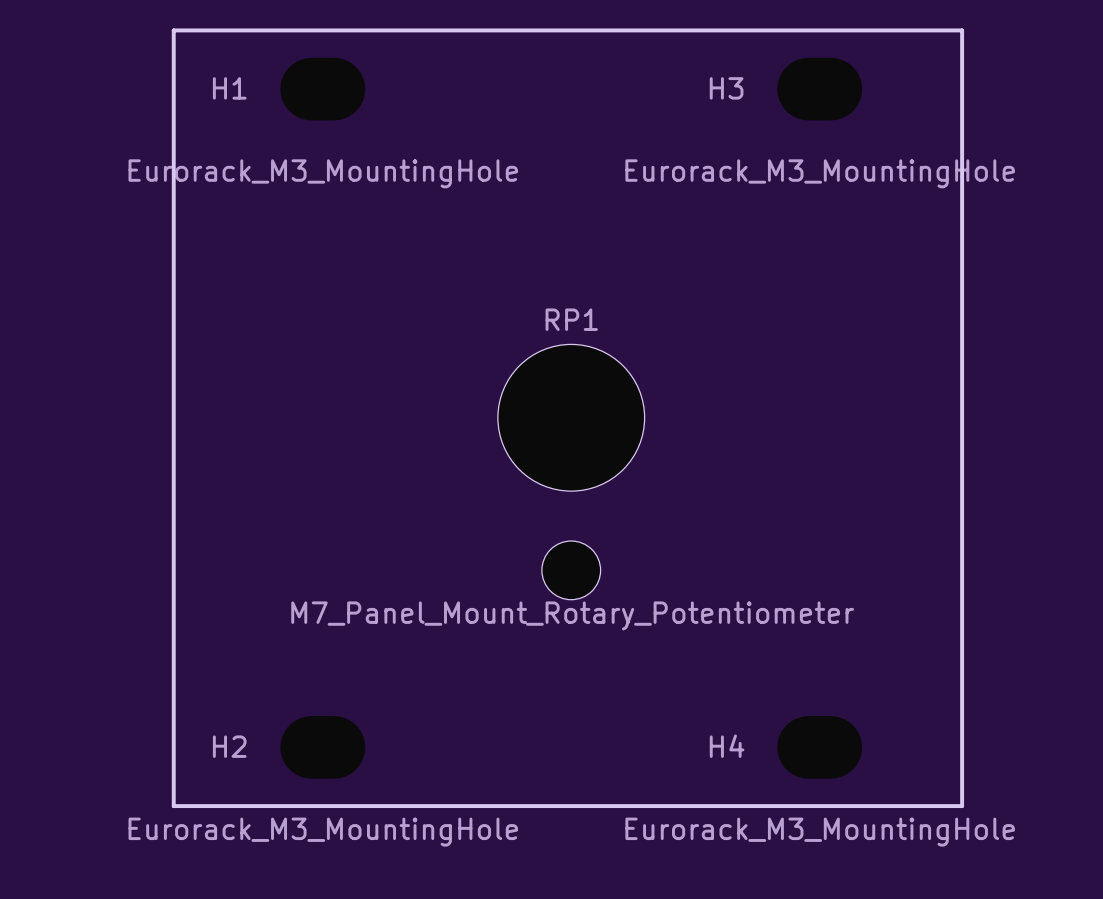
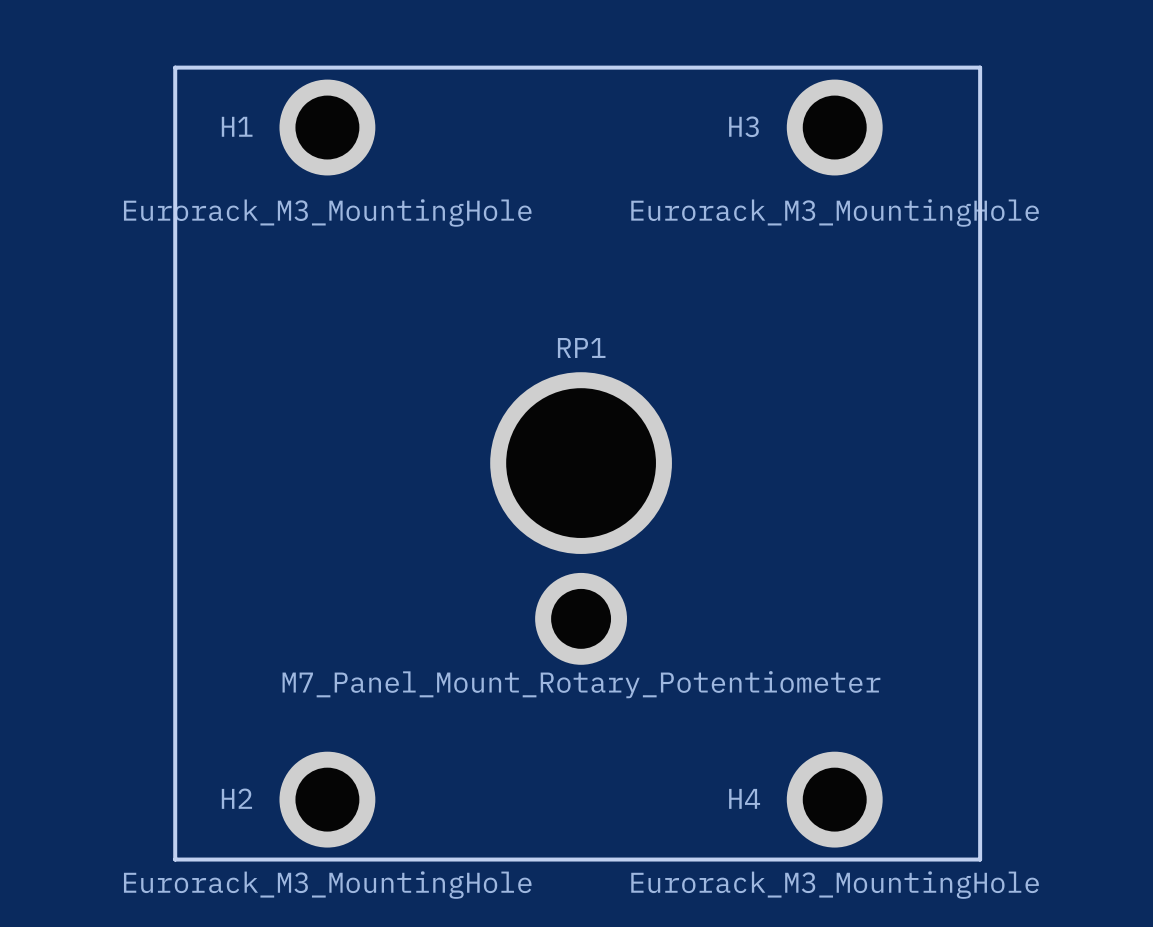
H1 footprint: [280, 57, 366, 121] -> [279, 79, 376, 176]
H3 footprint: [777, 57, 863, 121] -> [786, 79, 883, 176]
RP1 footprint: [497, 344, 645, 600] -> [490, 372, 672, 665]
H2 footprint: [280, 716, 366, 779] -> [279, 751, 376, 848]
H4 footprint: [777, 716, 863, 779] -> [786, 751, 883, 848]

